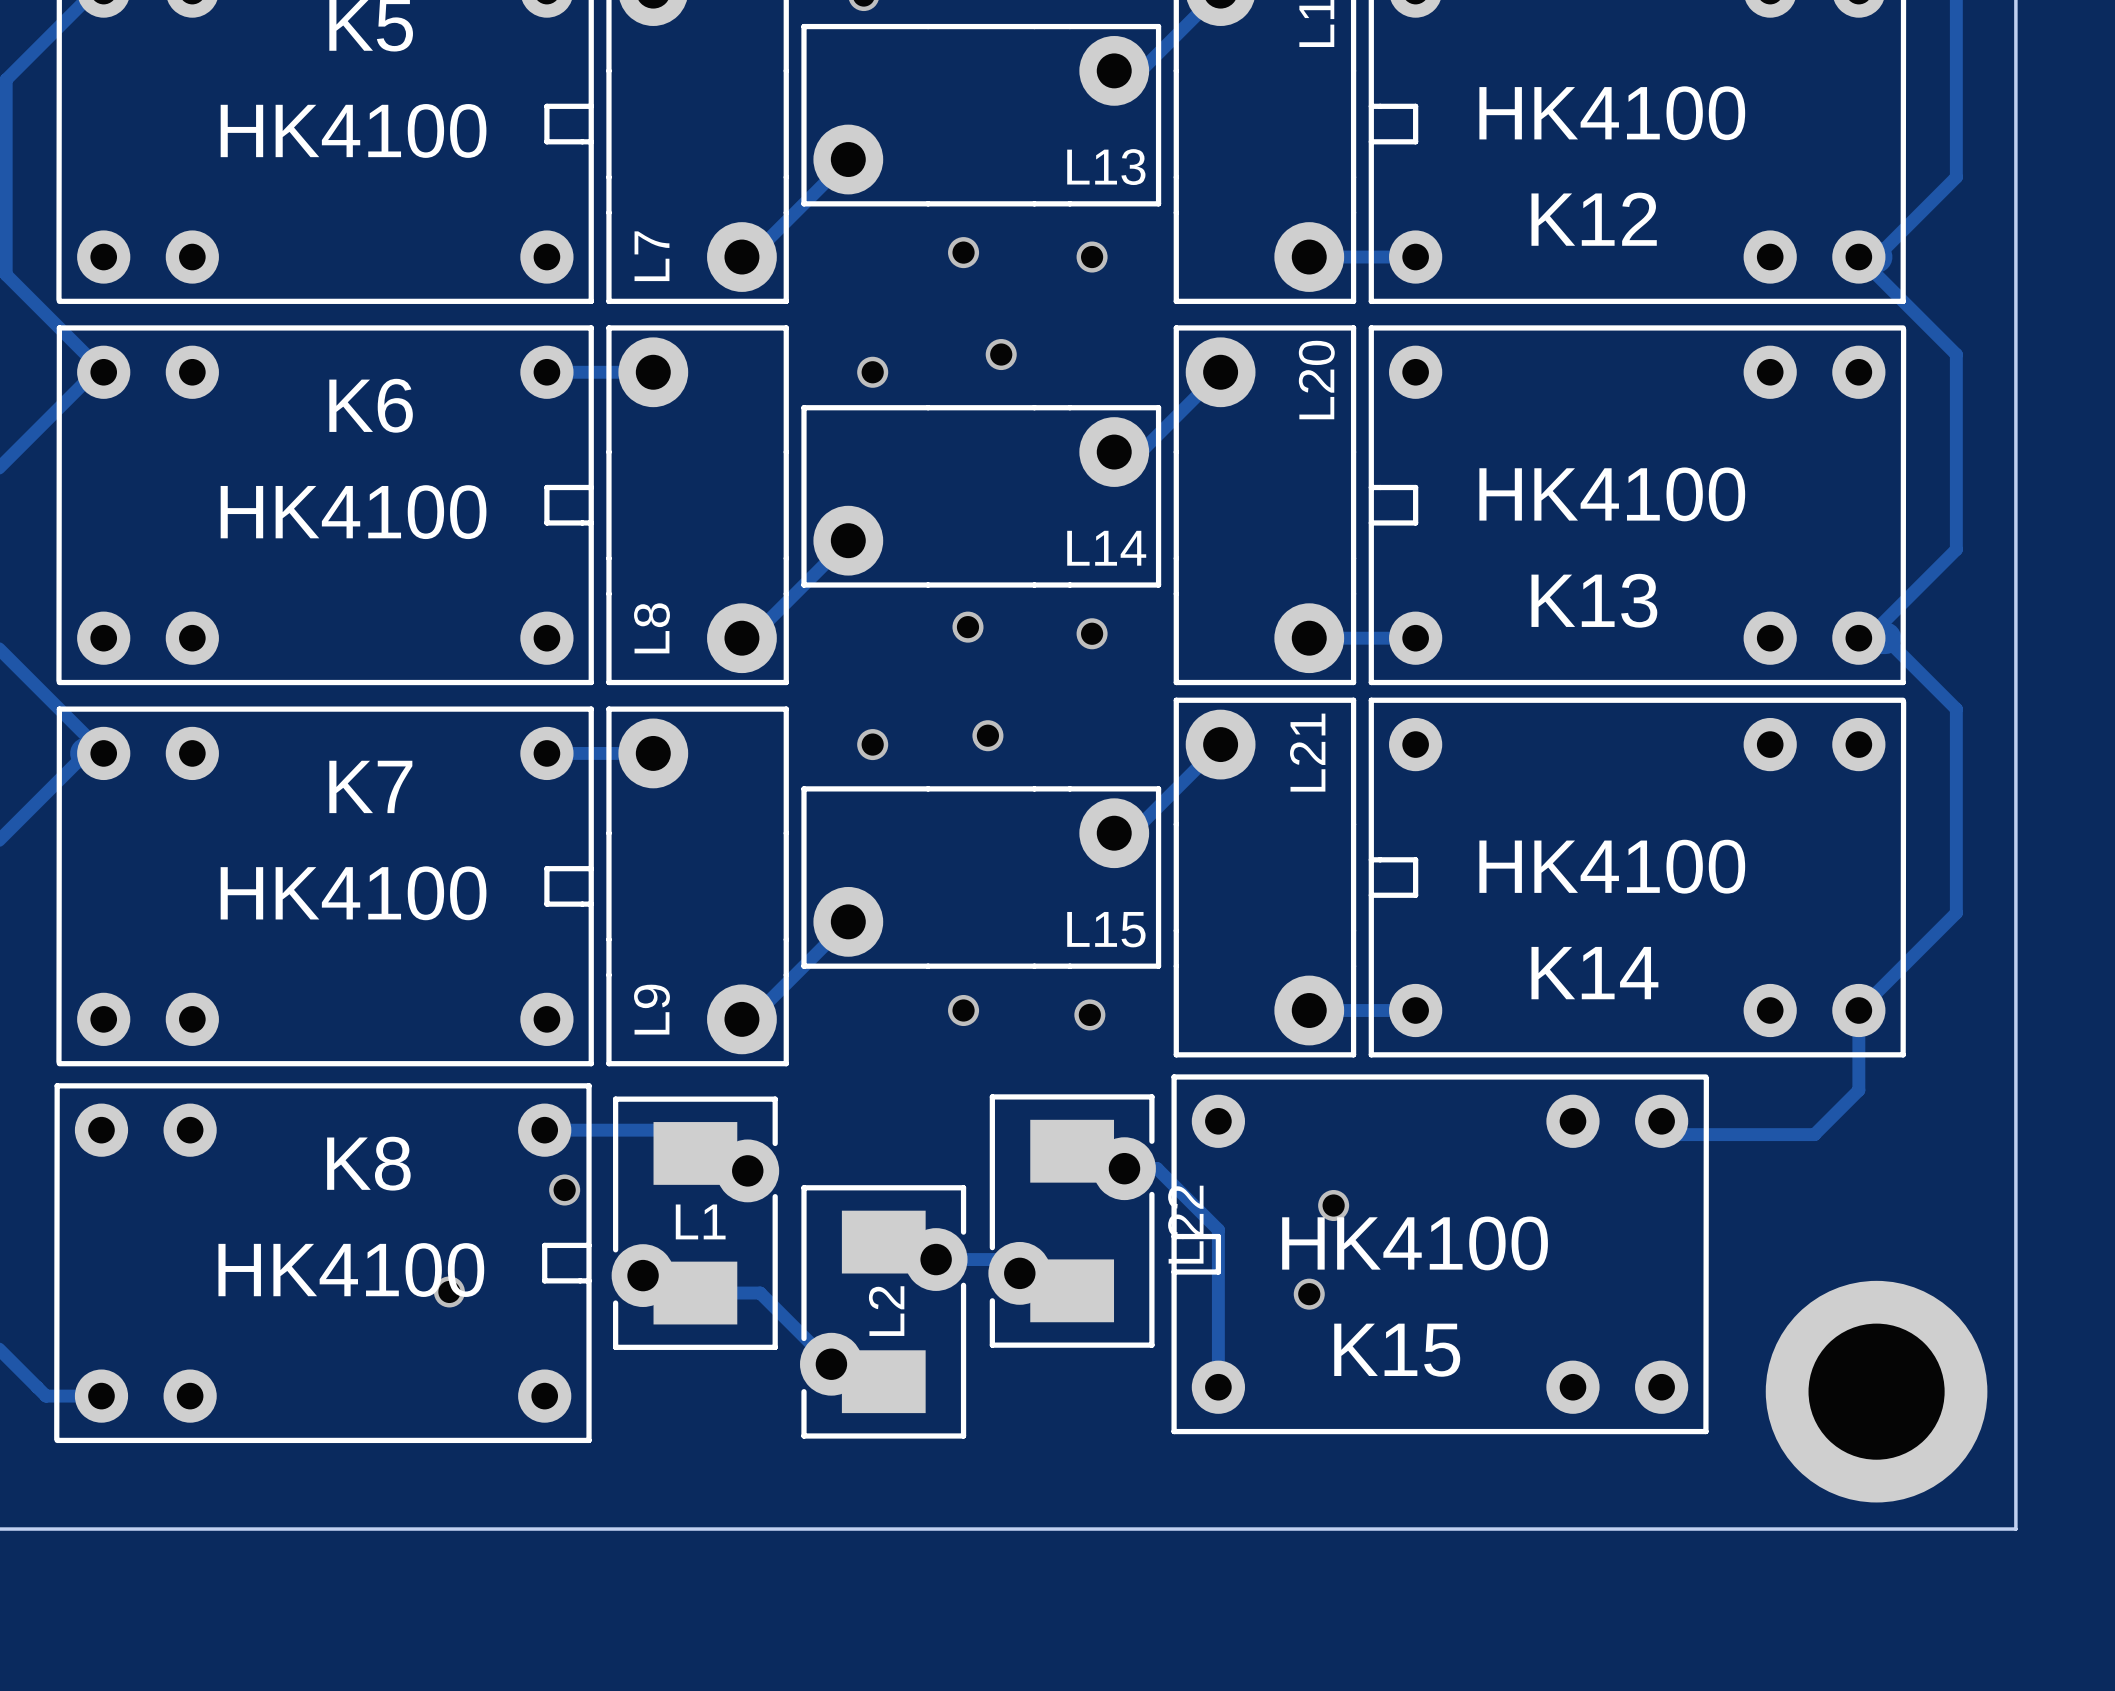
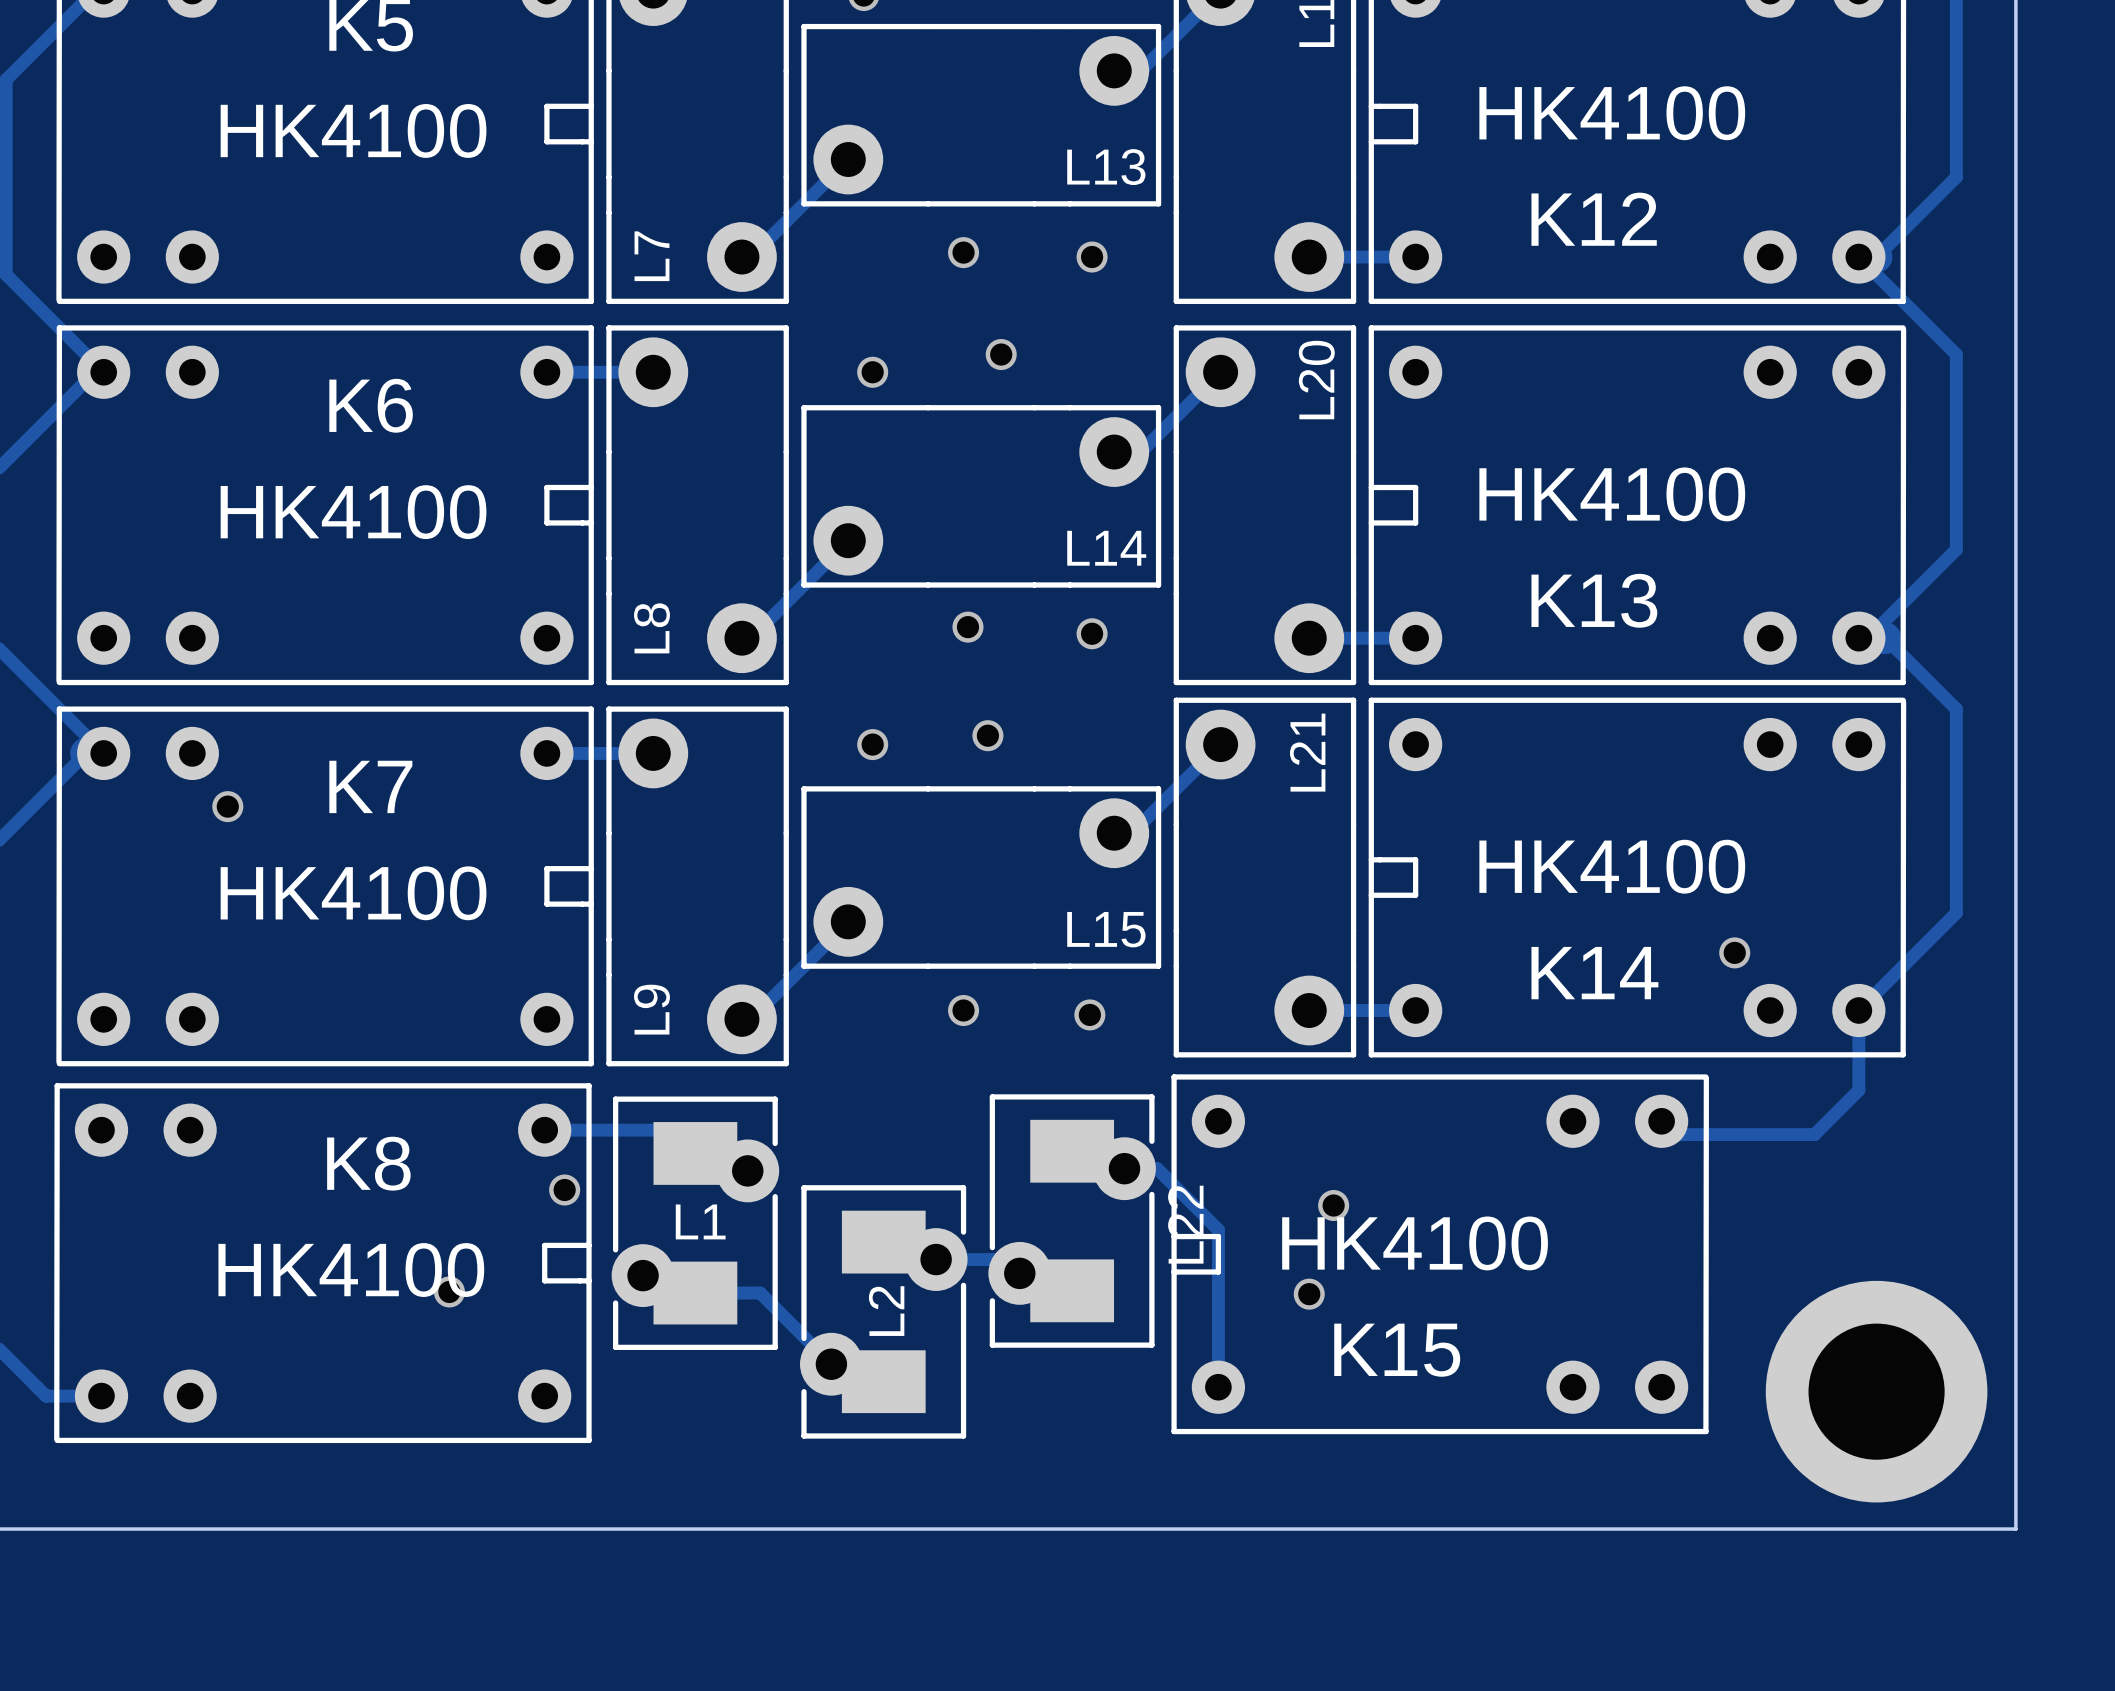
via: none -> (227, 806)
via: none -> (1734, 952)

